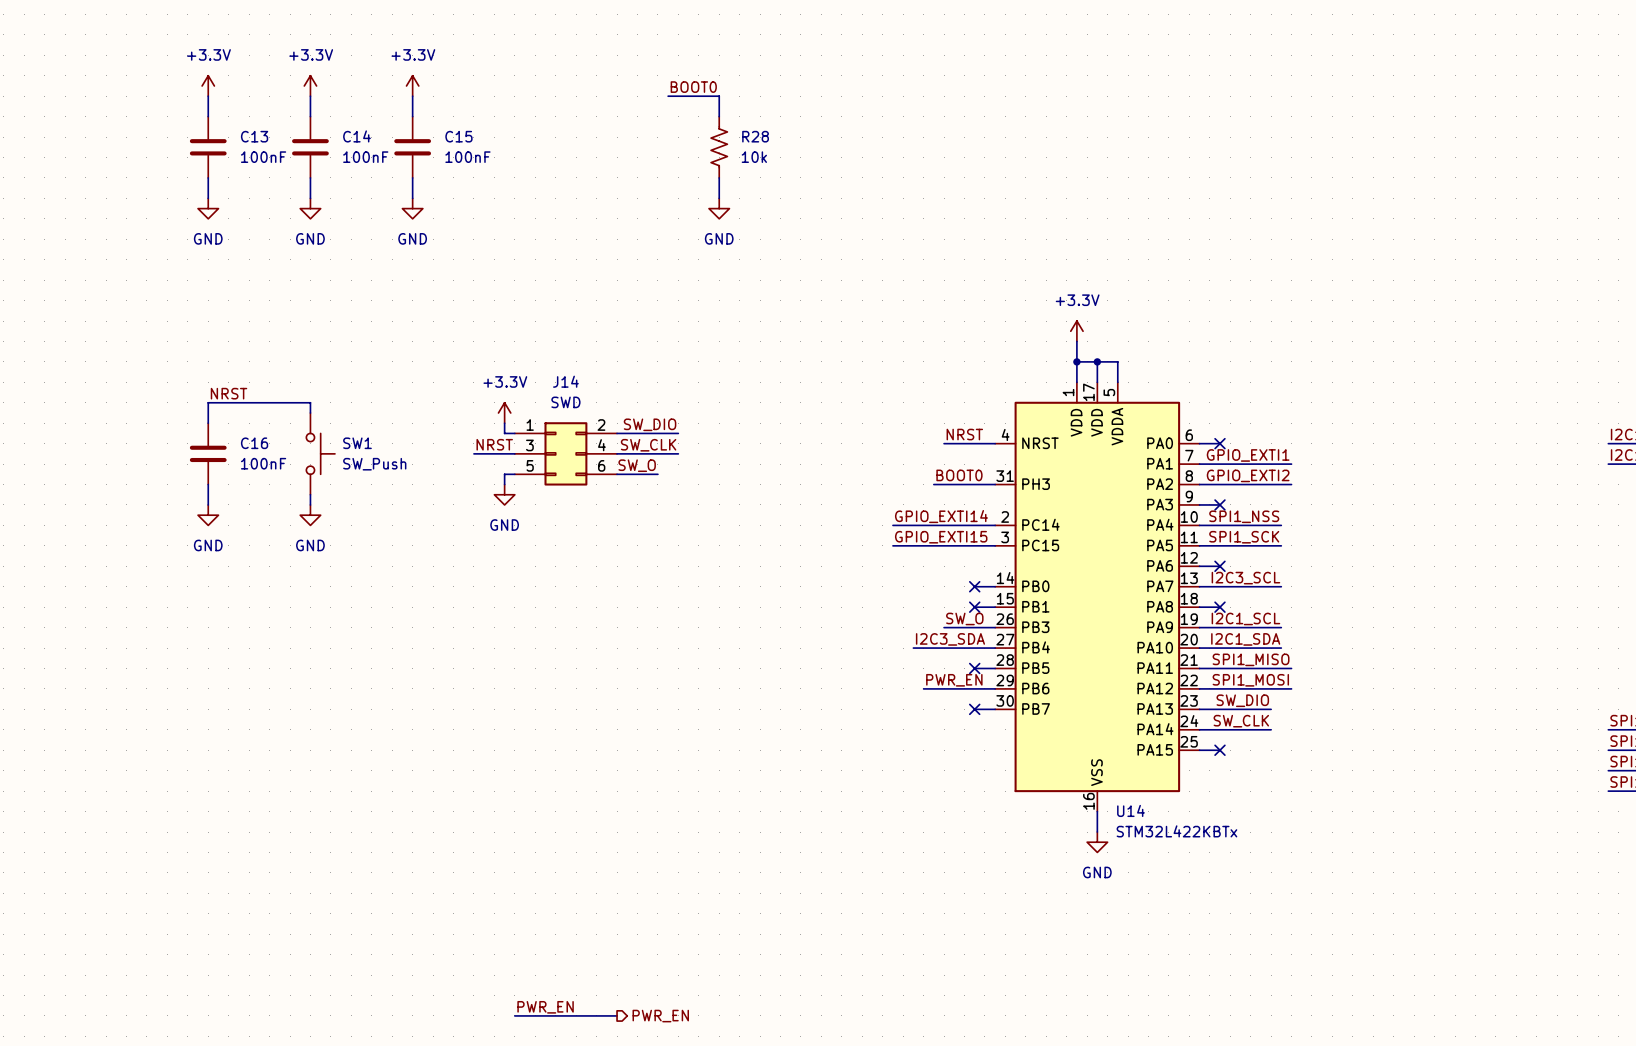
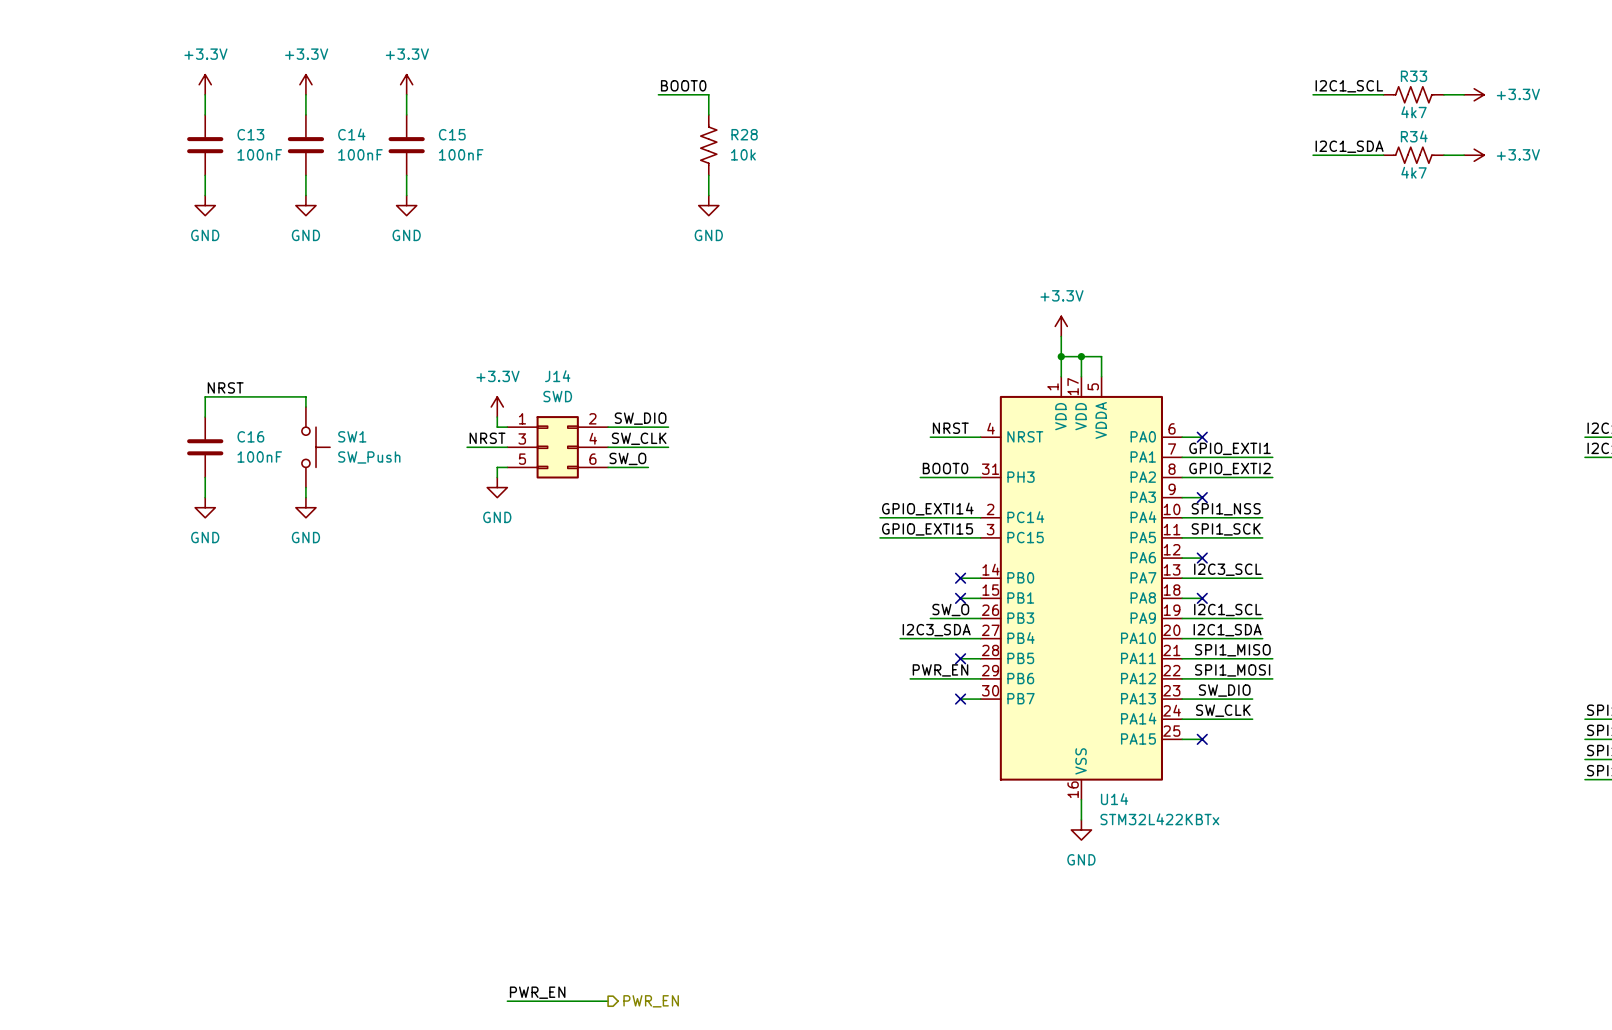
label: none -> I2C1_SCL (1349, 86)
wire: none -> (1313, 94) (1383, 94)
R33: none -> 4k7 (1413, 94)
wire: none -> (1443, 94) (1464, 94)
power symbol: none -> +3.3V (1474, 94)
label: none -> I2C1_SDA (1349, 146)
wire: none -> (1313, 155) (1383, 155)
R34: none -> 4k7 (1413, 155)
wire: none -> (1443, 155) (1464, 155)
power symbol: none -> +3.3V (1474, 155)

